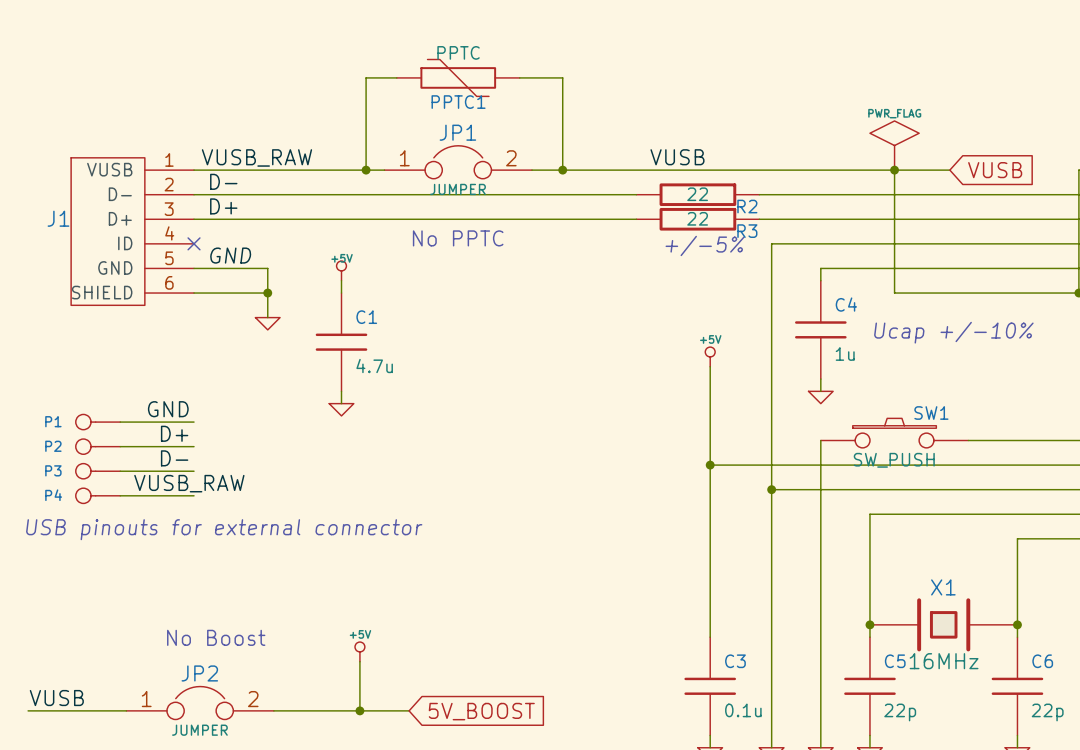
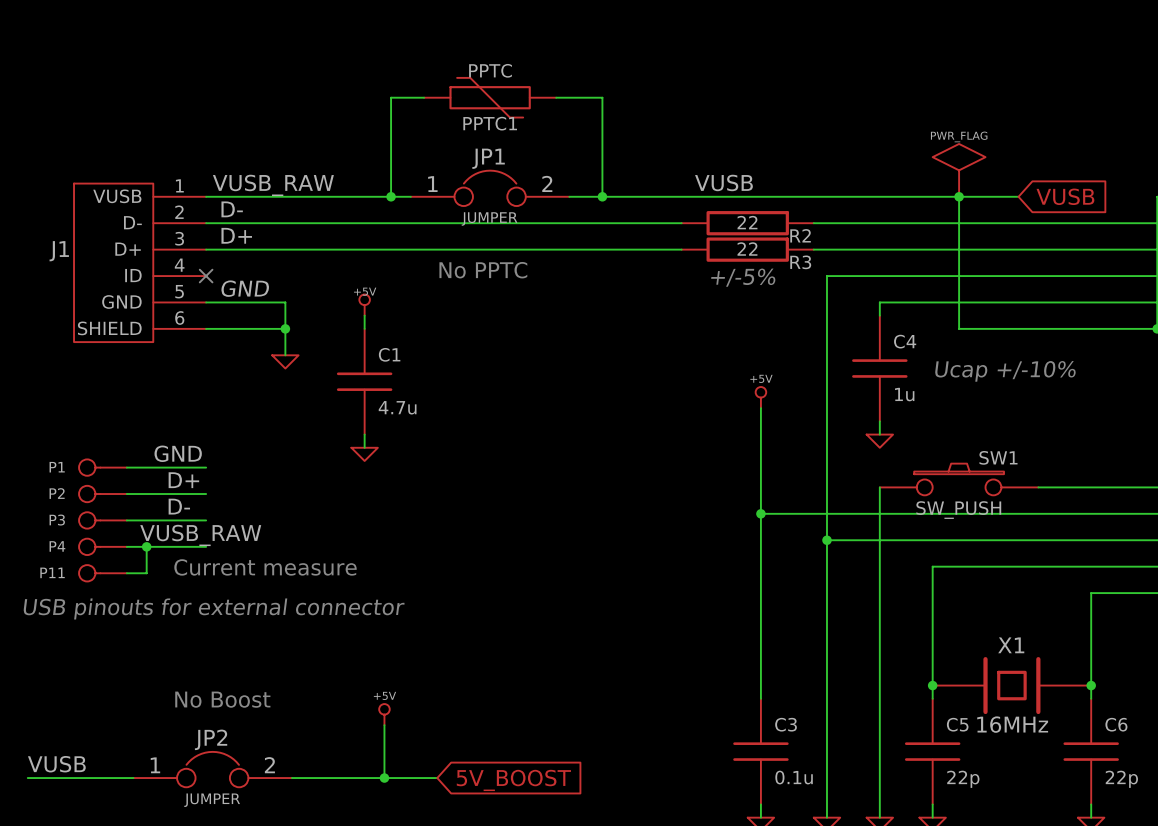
wire: none -> (146, 546) (146, 573) (126, 573)
junction: none -> (146, 546)
text: none -> Current measure (265, 567)
P11: none -> (102, 573)
text position: USB pinouts for external connector (224, 529) -> USB pinouts for external connector (213, 608)

